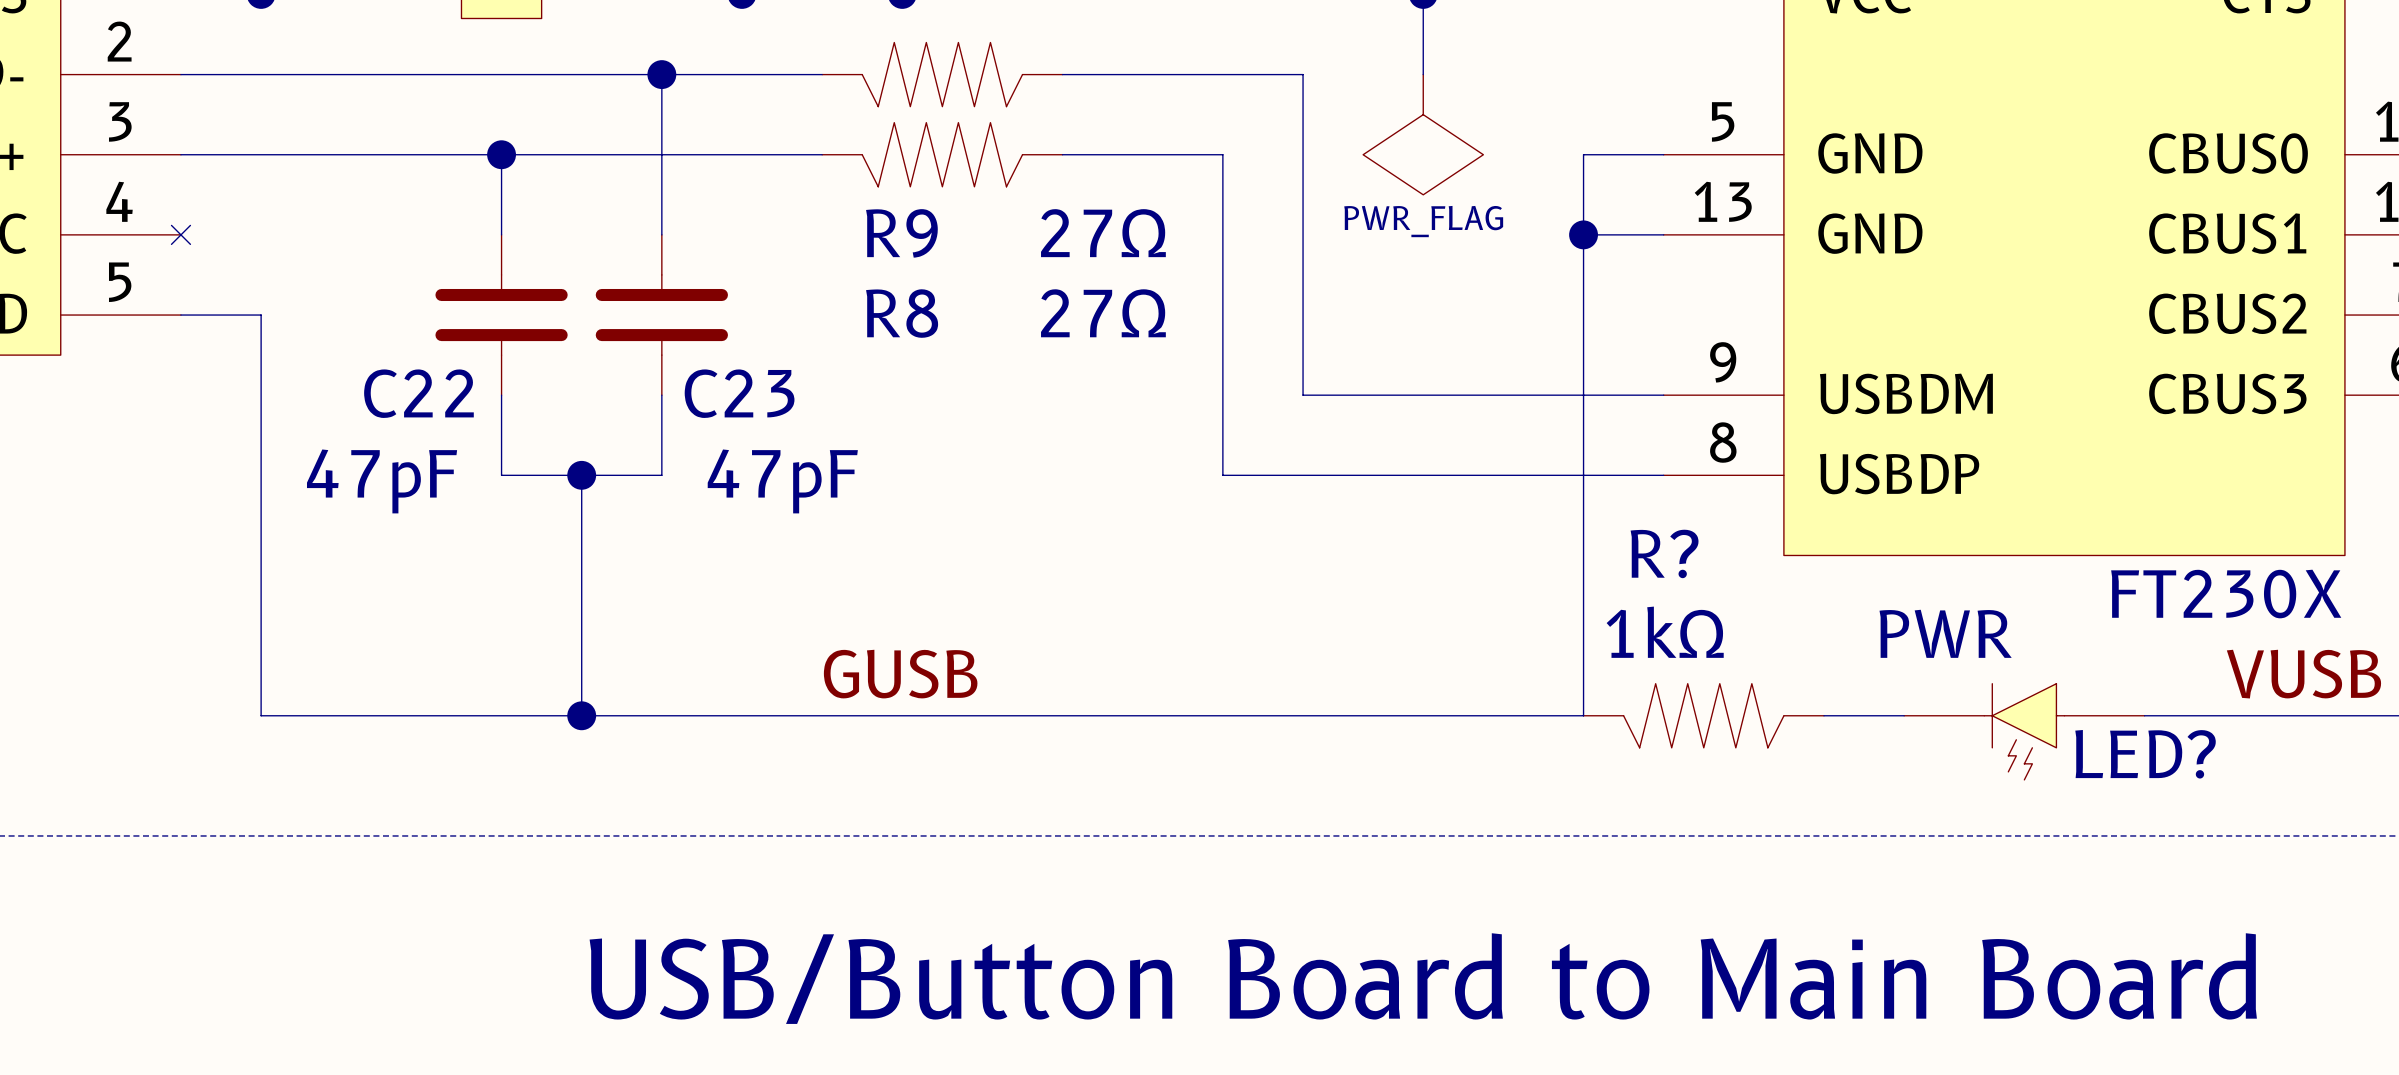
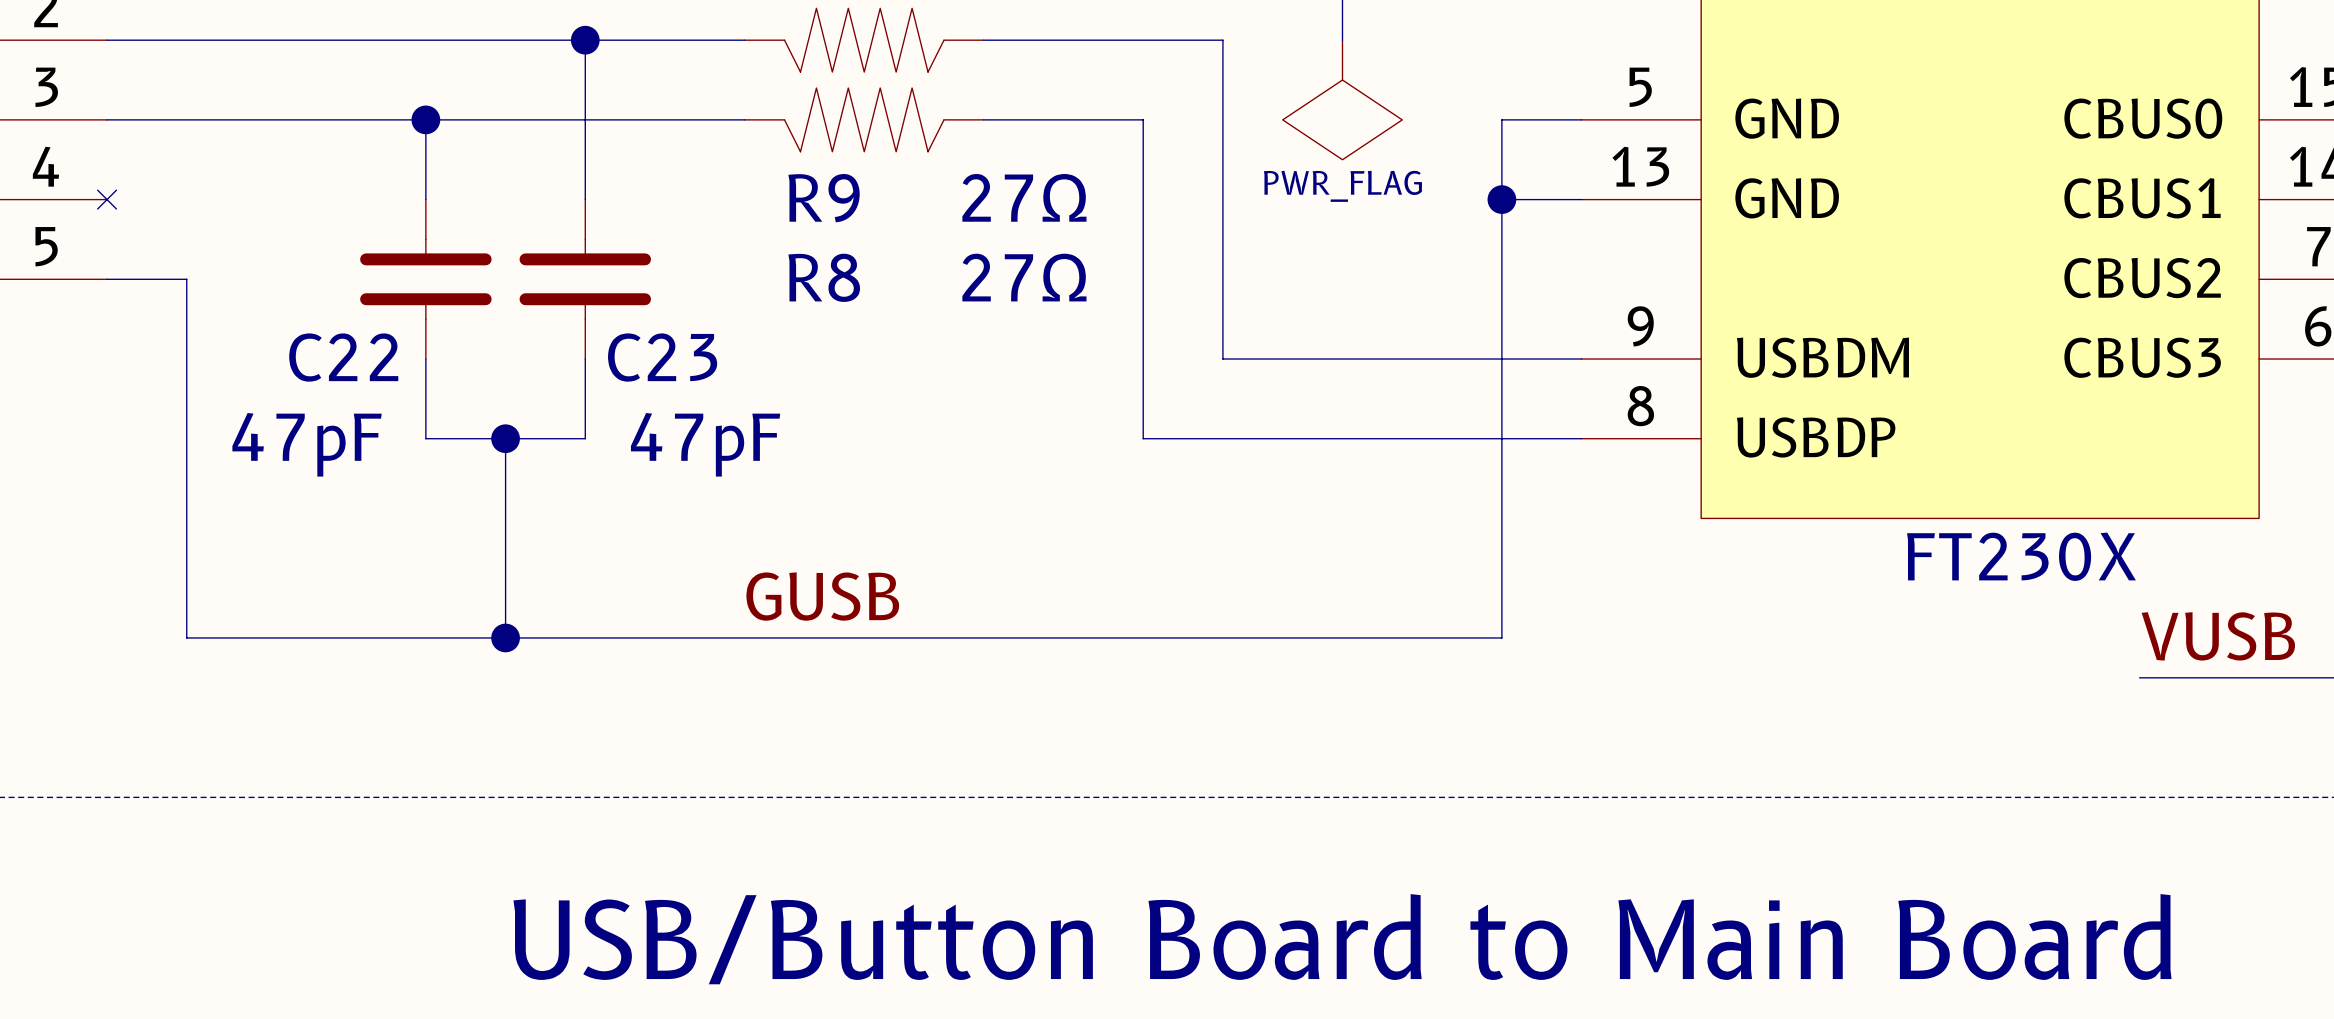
part value position: FT230X (2226, 594) -> FT230X (2021, 556)
label position: GUSB (900, 674) -> GUSB (822, 596)
wire: (261, 675) (261, 715) (1583, 715) (1583, 675) -> (186, 637) (1501, 637)
wire: (581, 675) (581, 715) -> none
junction position: (581, 715) -> (505, 637)
R?: 1kΩ (1703, 715) -> none
wire: (1823, 715) (1904, 715) -> none
wire: (2144, 715) (2224, 715) -> none
LED?: PWR (2024, 731) -> none

